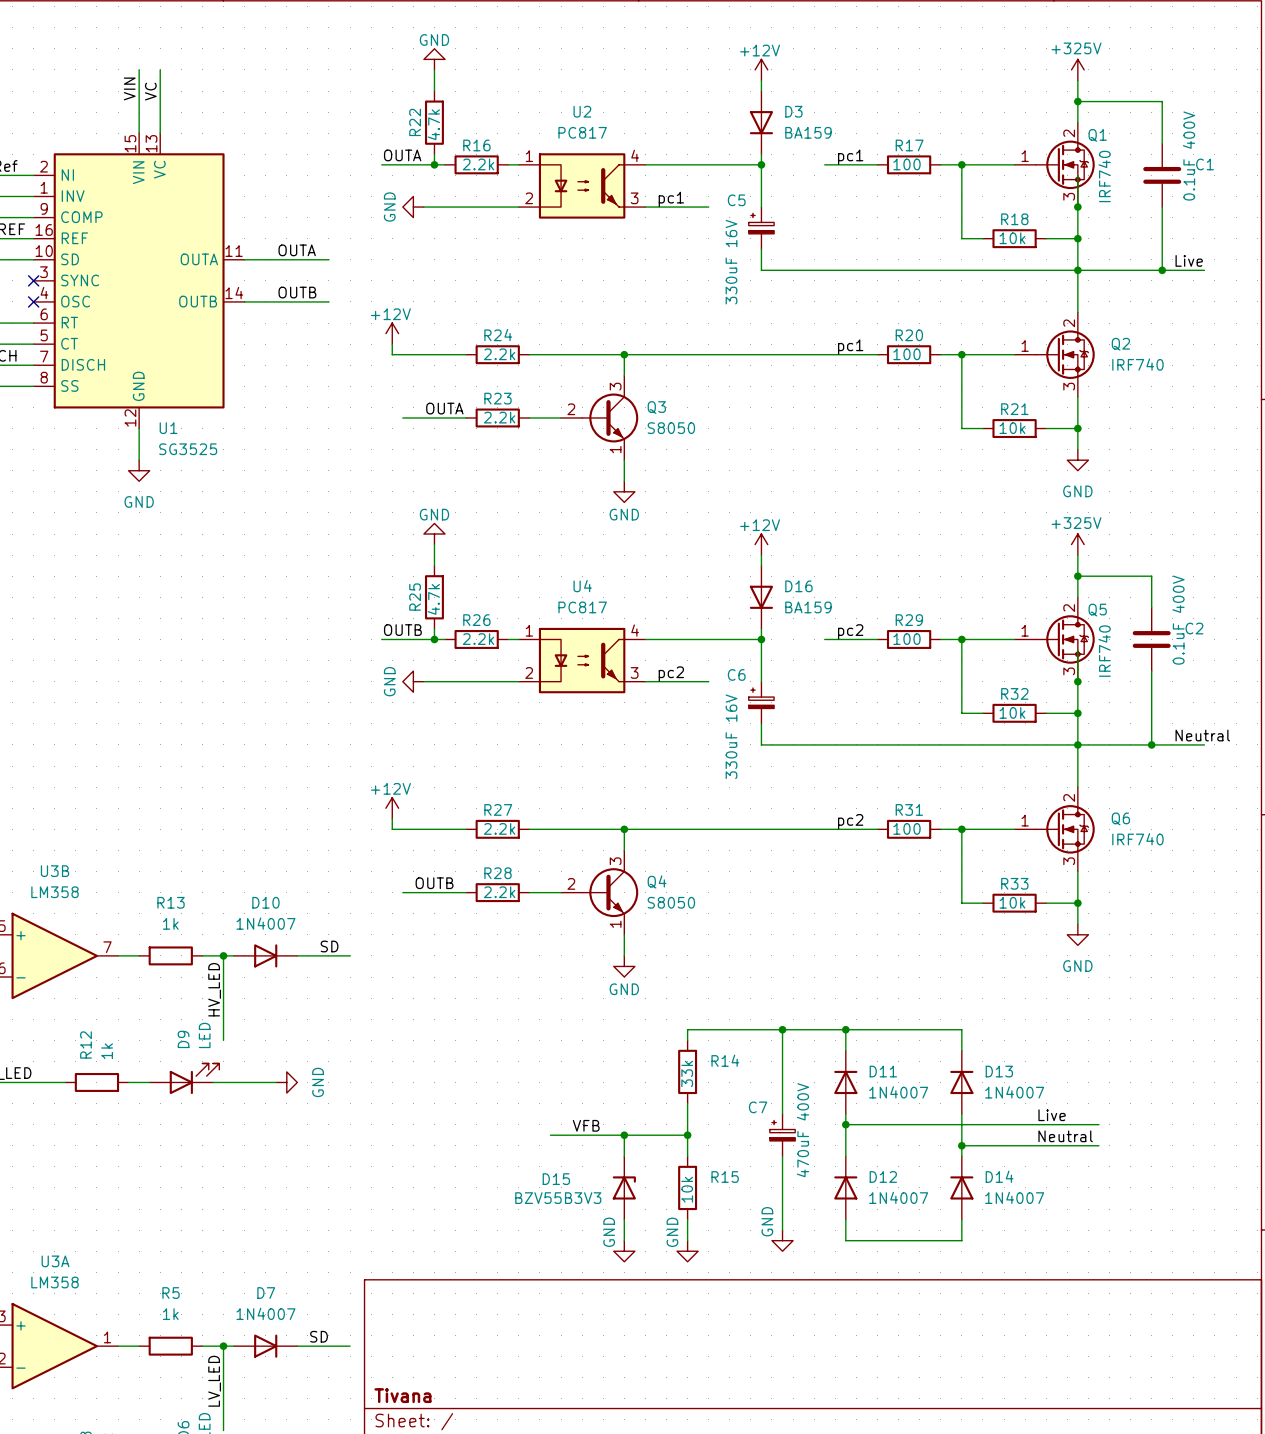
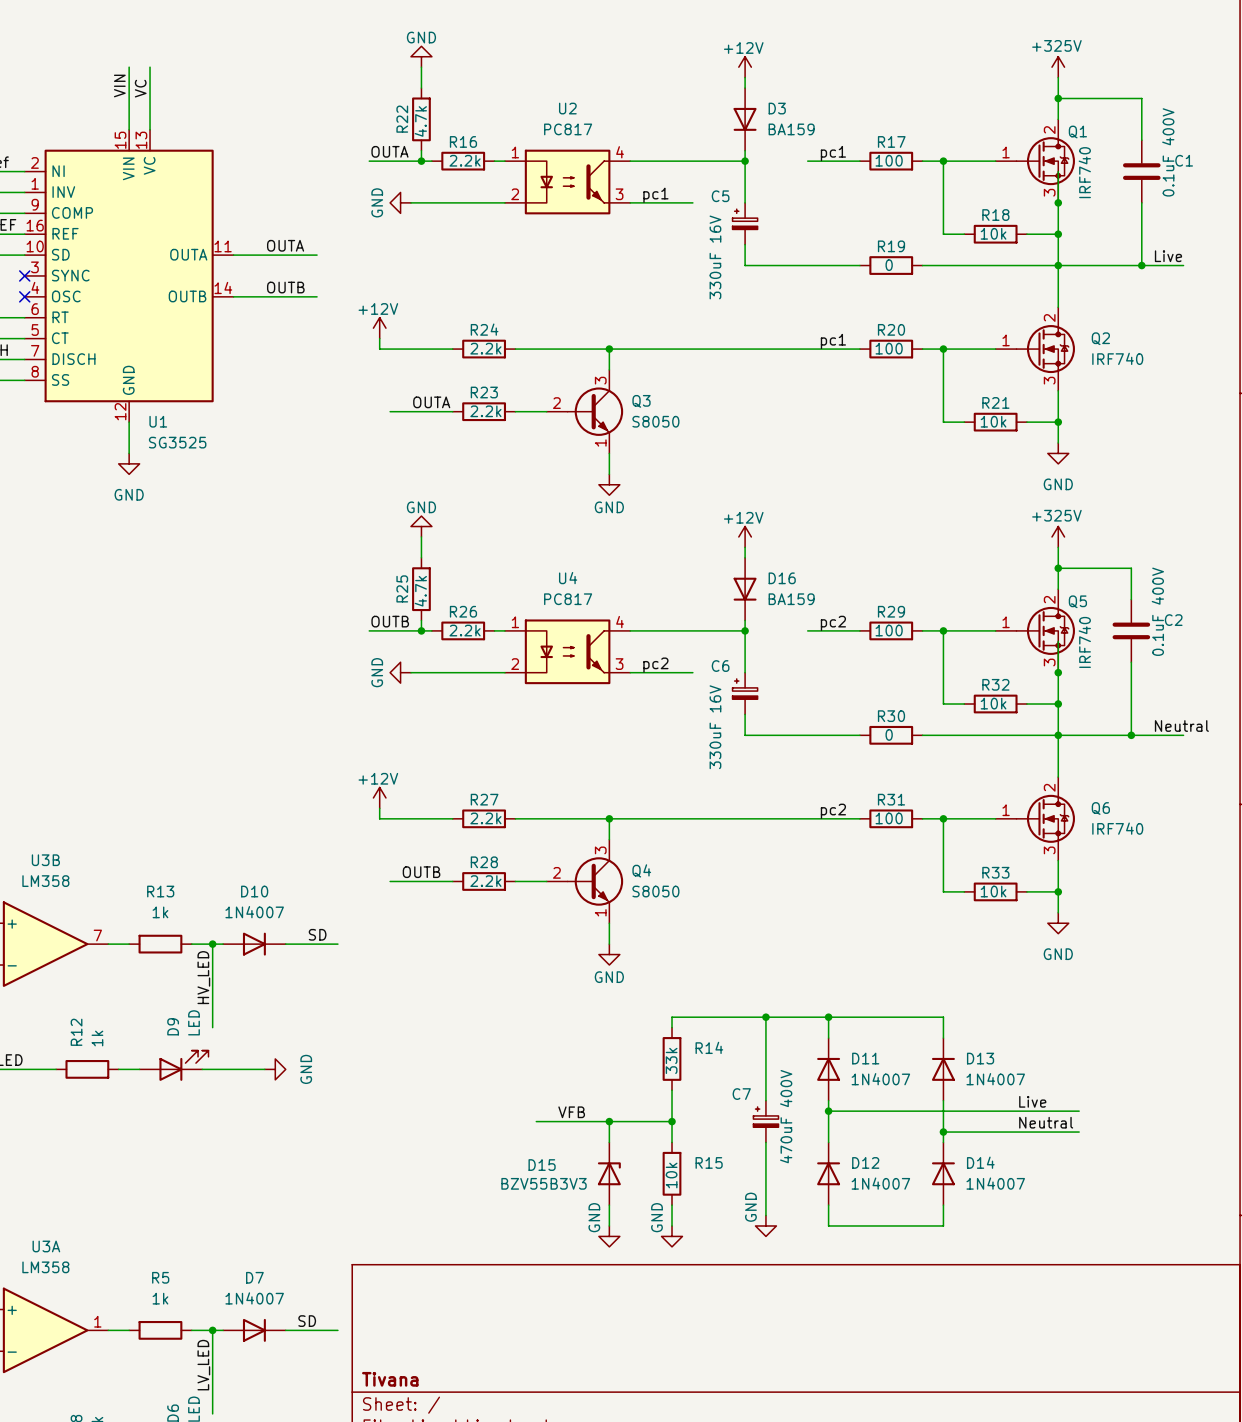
wire: (877, 270) (940, 270) -> none
R19: none -> 0 (891, 265)
wire: (877, 744) (940, 744) -> none
R30: none -> 0 (891, 735)

